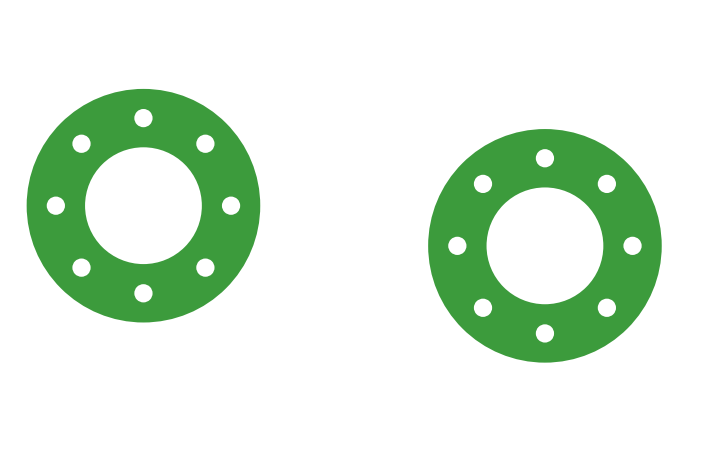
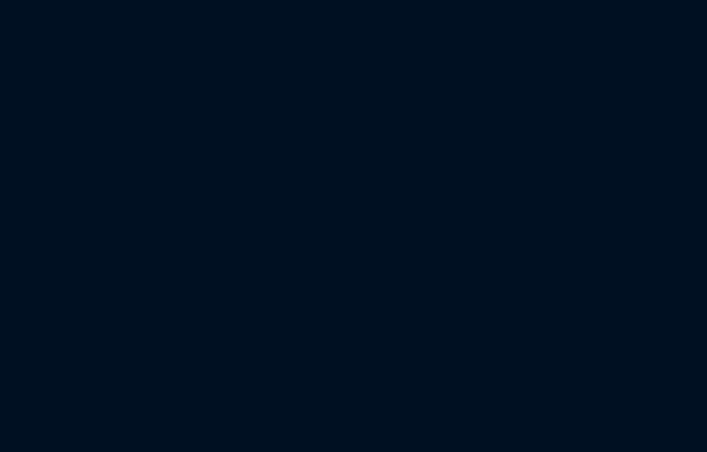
part: (143, 205) -> none
part: (544, 245) -> none

